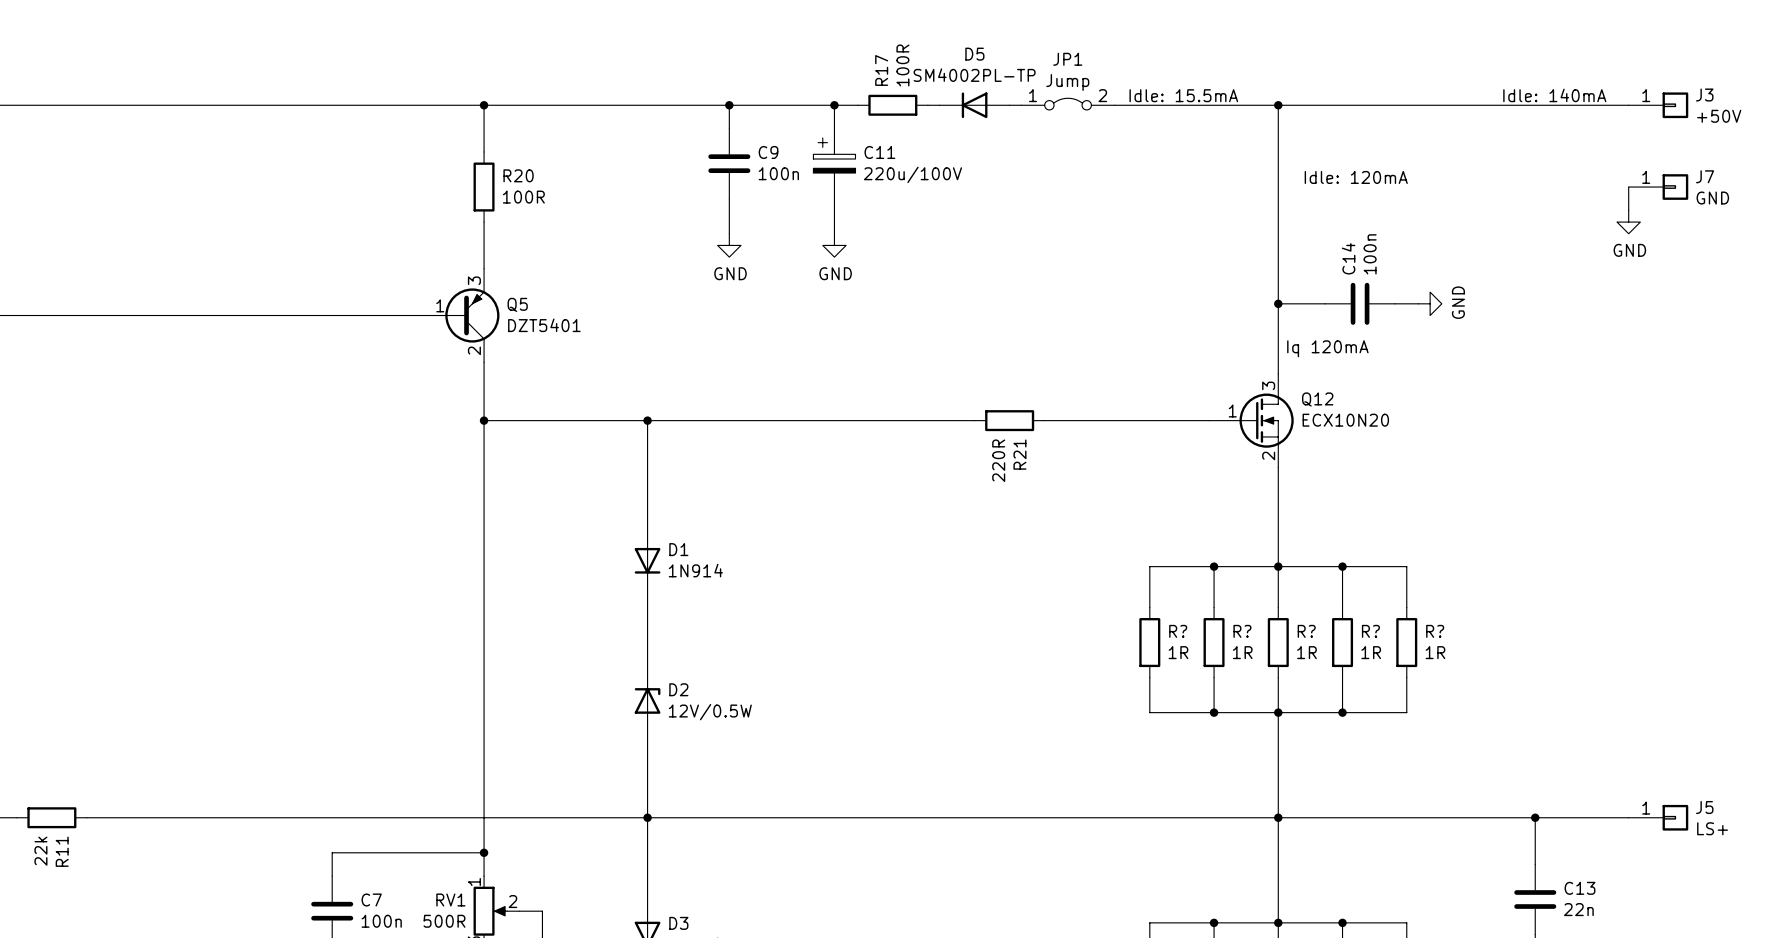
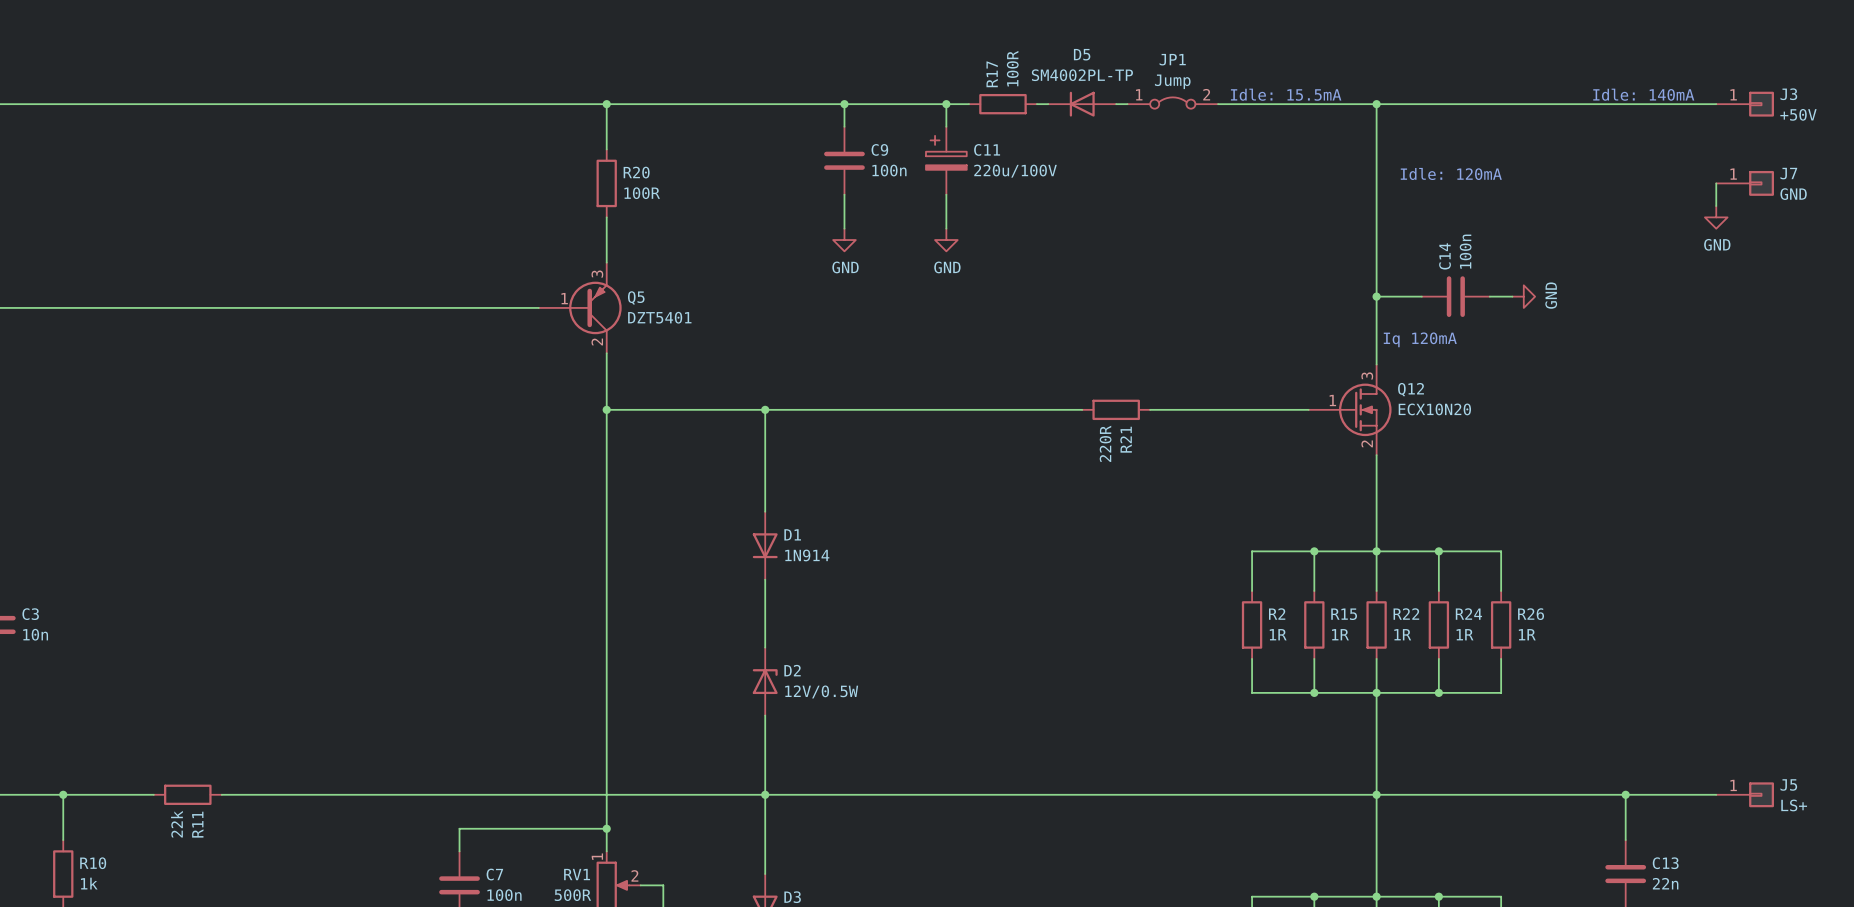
R? name: R? (1178, 631) -> R2 (1277, 614)
R? name: R? (1242, 631) -> R15 (1344, 614)
R? name: R? (1306, 631) -> R22 (1406, 614)
R? name: R? (1370, 631) -> R24 (1468, 614)
R? name: R? (1435, 631) -> R26 (1531, 614)

